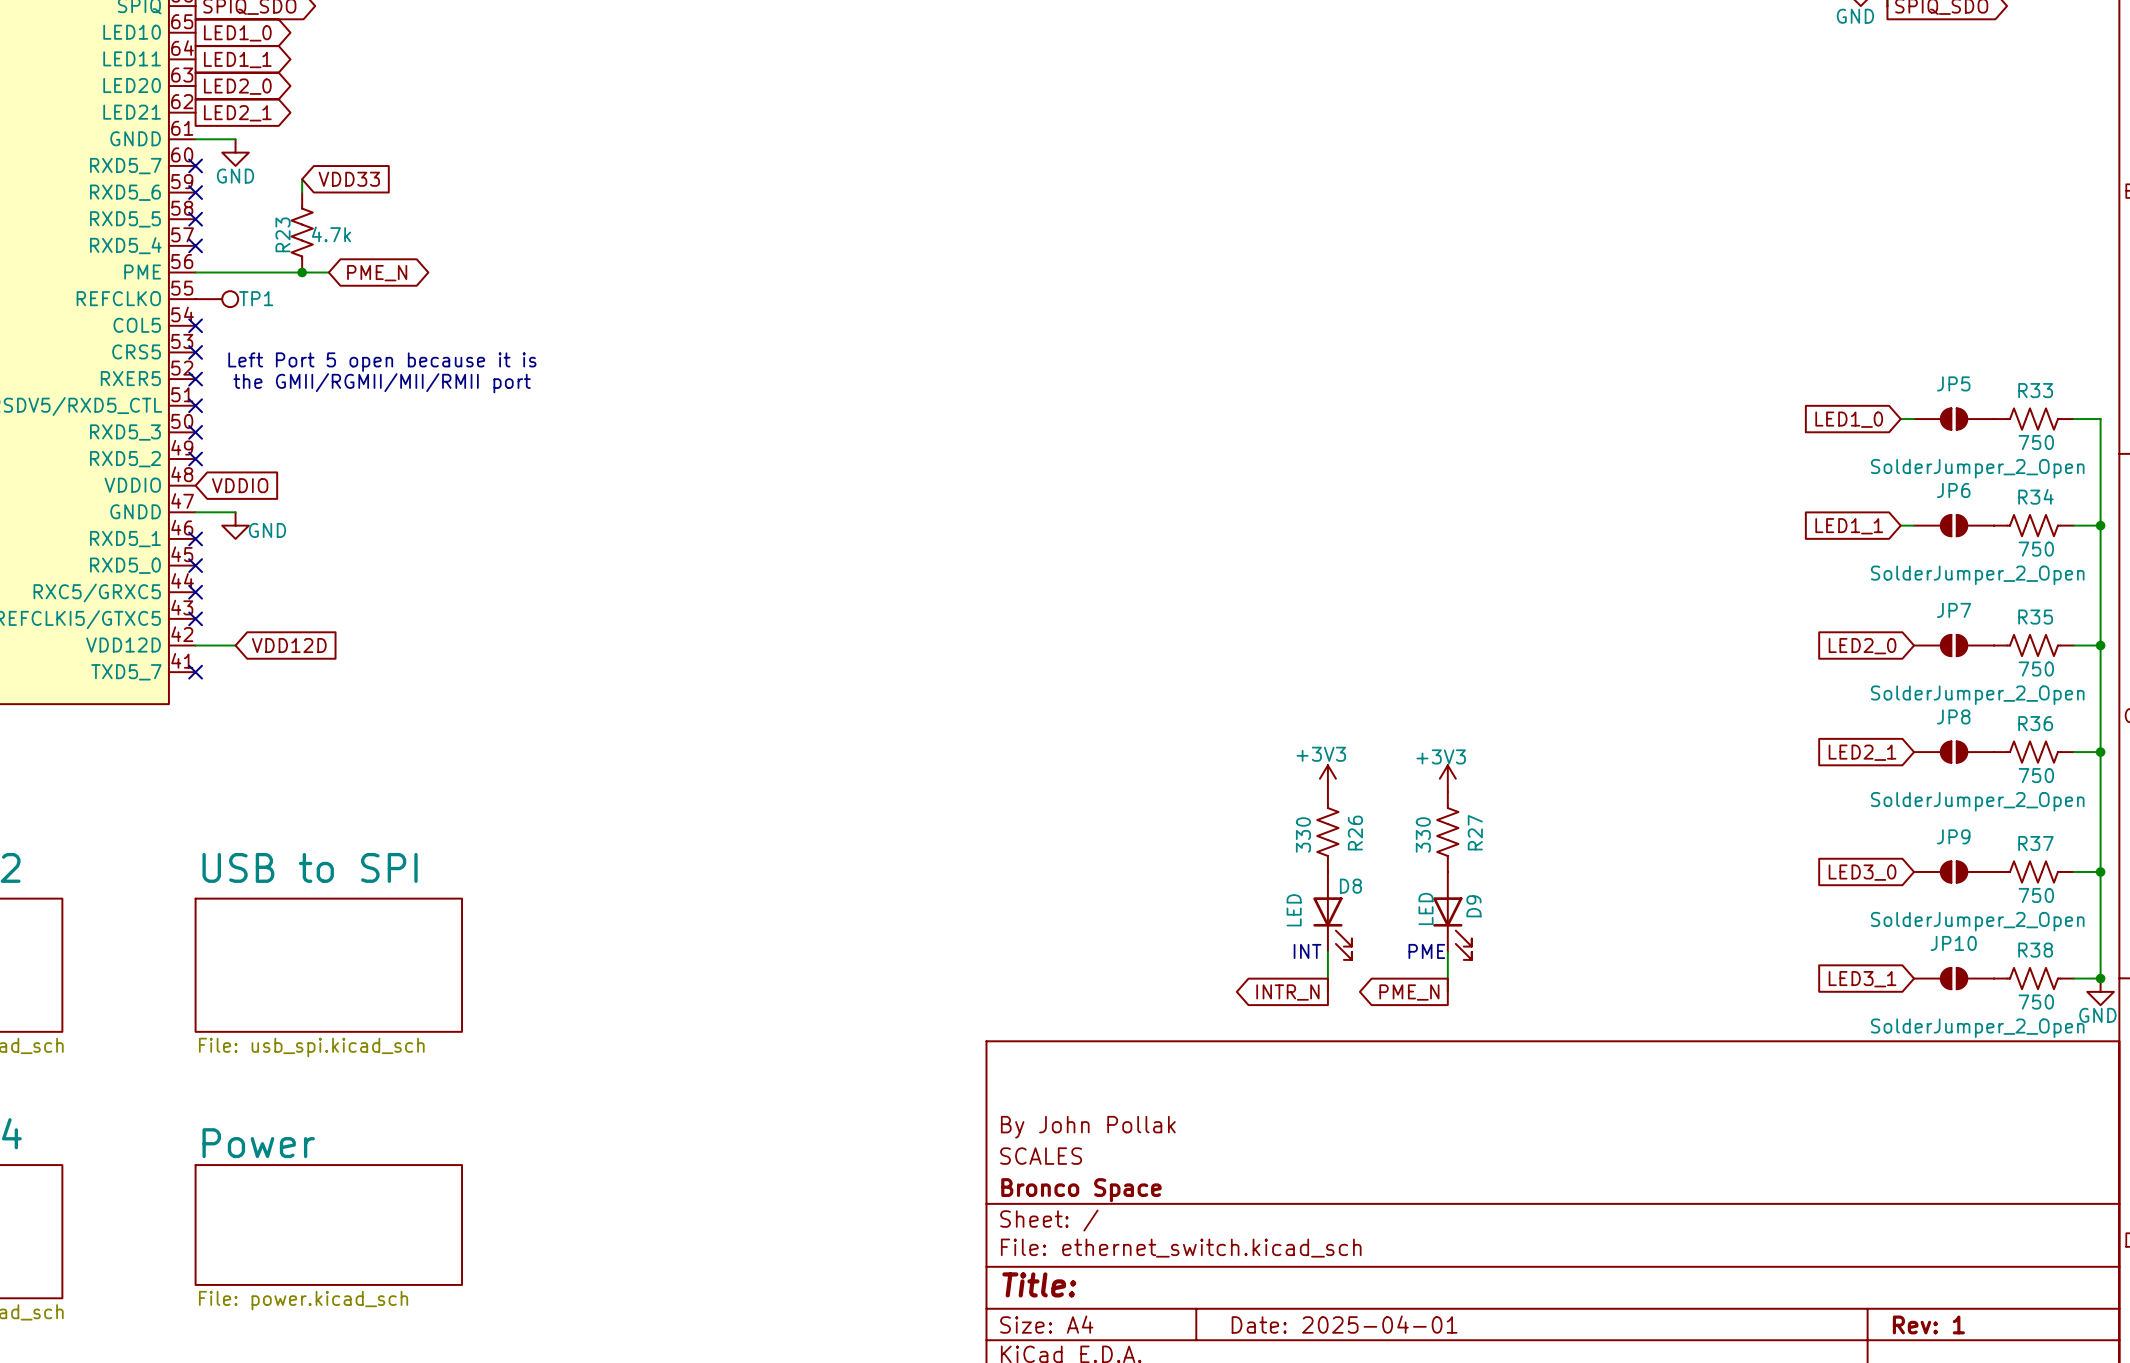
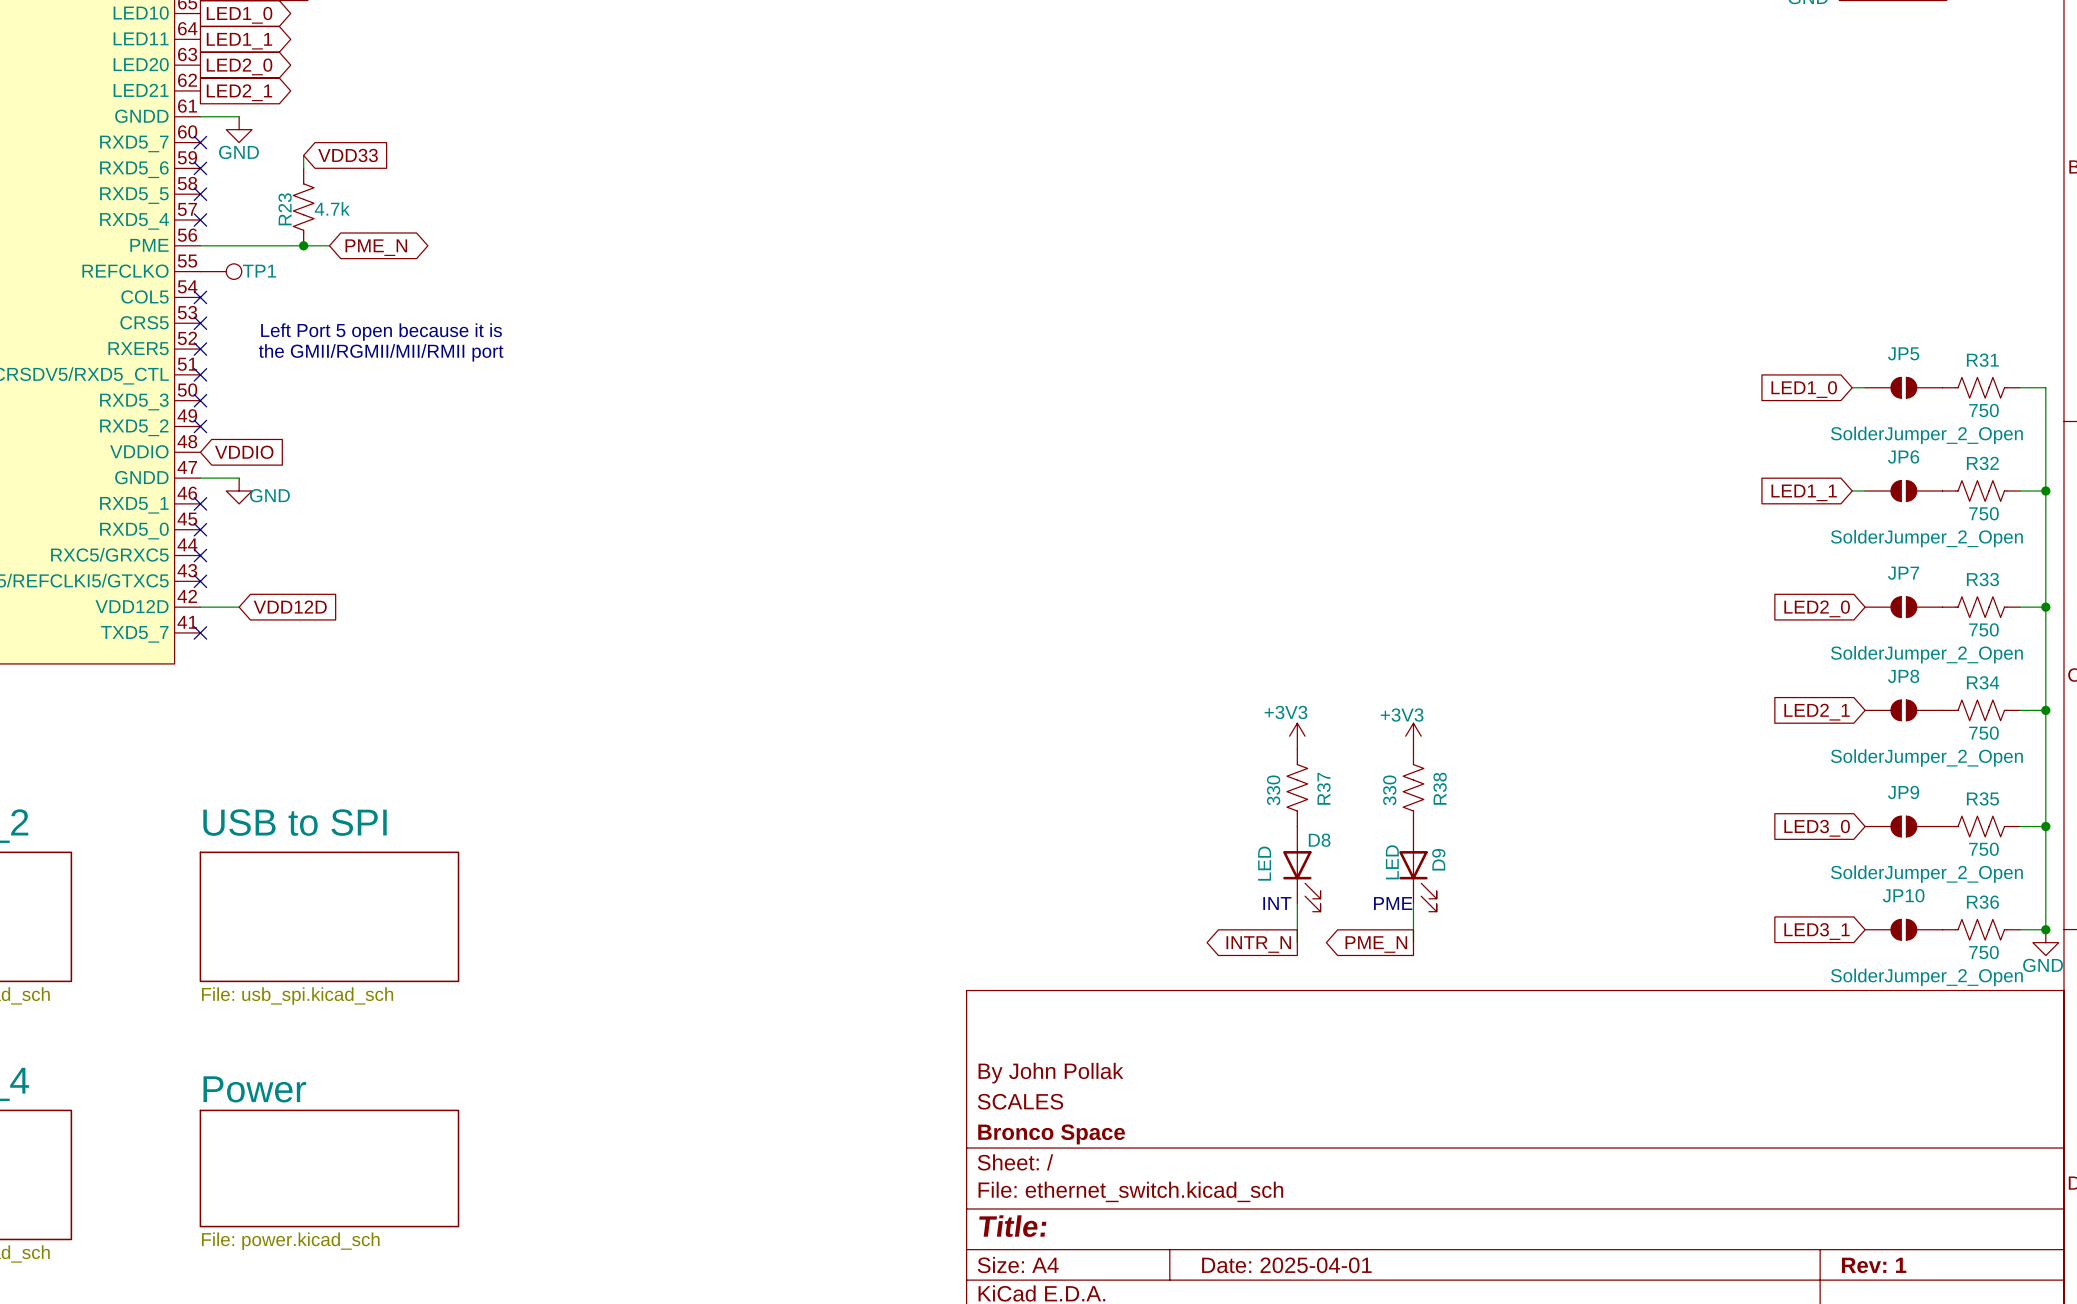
R33 name: R33 (2035, 390) -> R31 (1982, 360)
R34 name: R34 (2035, 496) -> R32 (1982, 463)
R35 name: R35 (2035, 617) -> R33 (1982, 579)
R36 name: R36 (2035, 723) -> R34 (1983, 682)
R27 name: R27 (1475, 832) -> R38 (1440, 788)
R26 name: R26 (1355, 833) -> R37 (1323, 788)
R37 name: R37 (2035, 843) -> R35 (1982, 798)
R38 name: R38 (2035, 950) -> R36 (1982, 902)

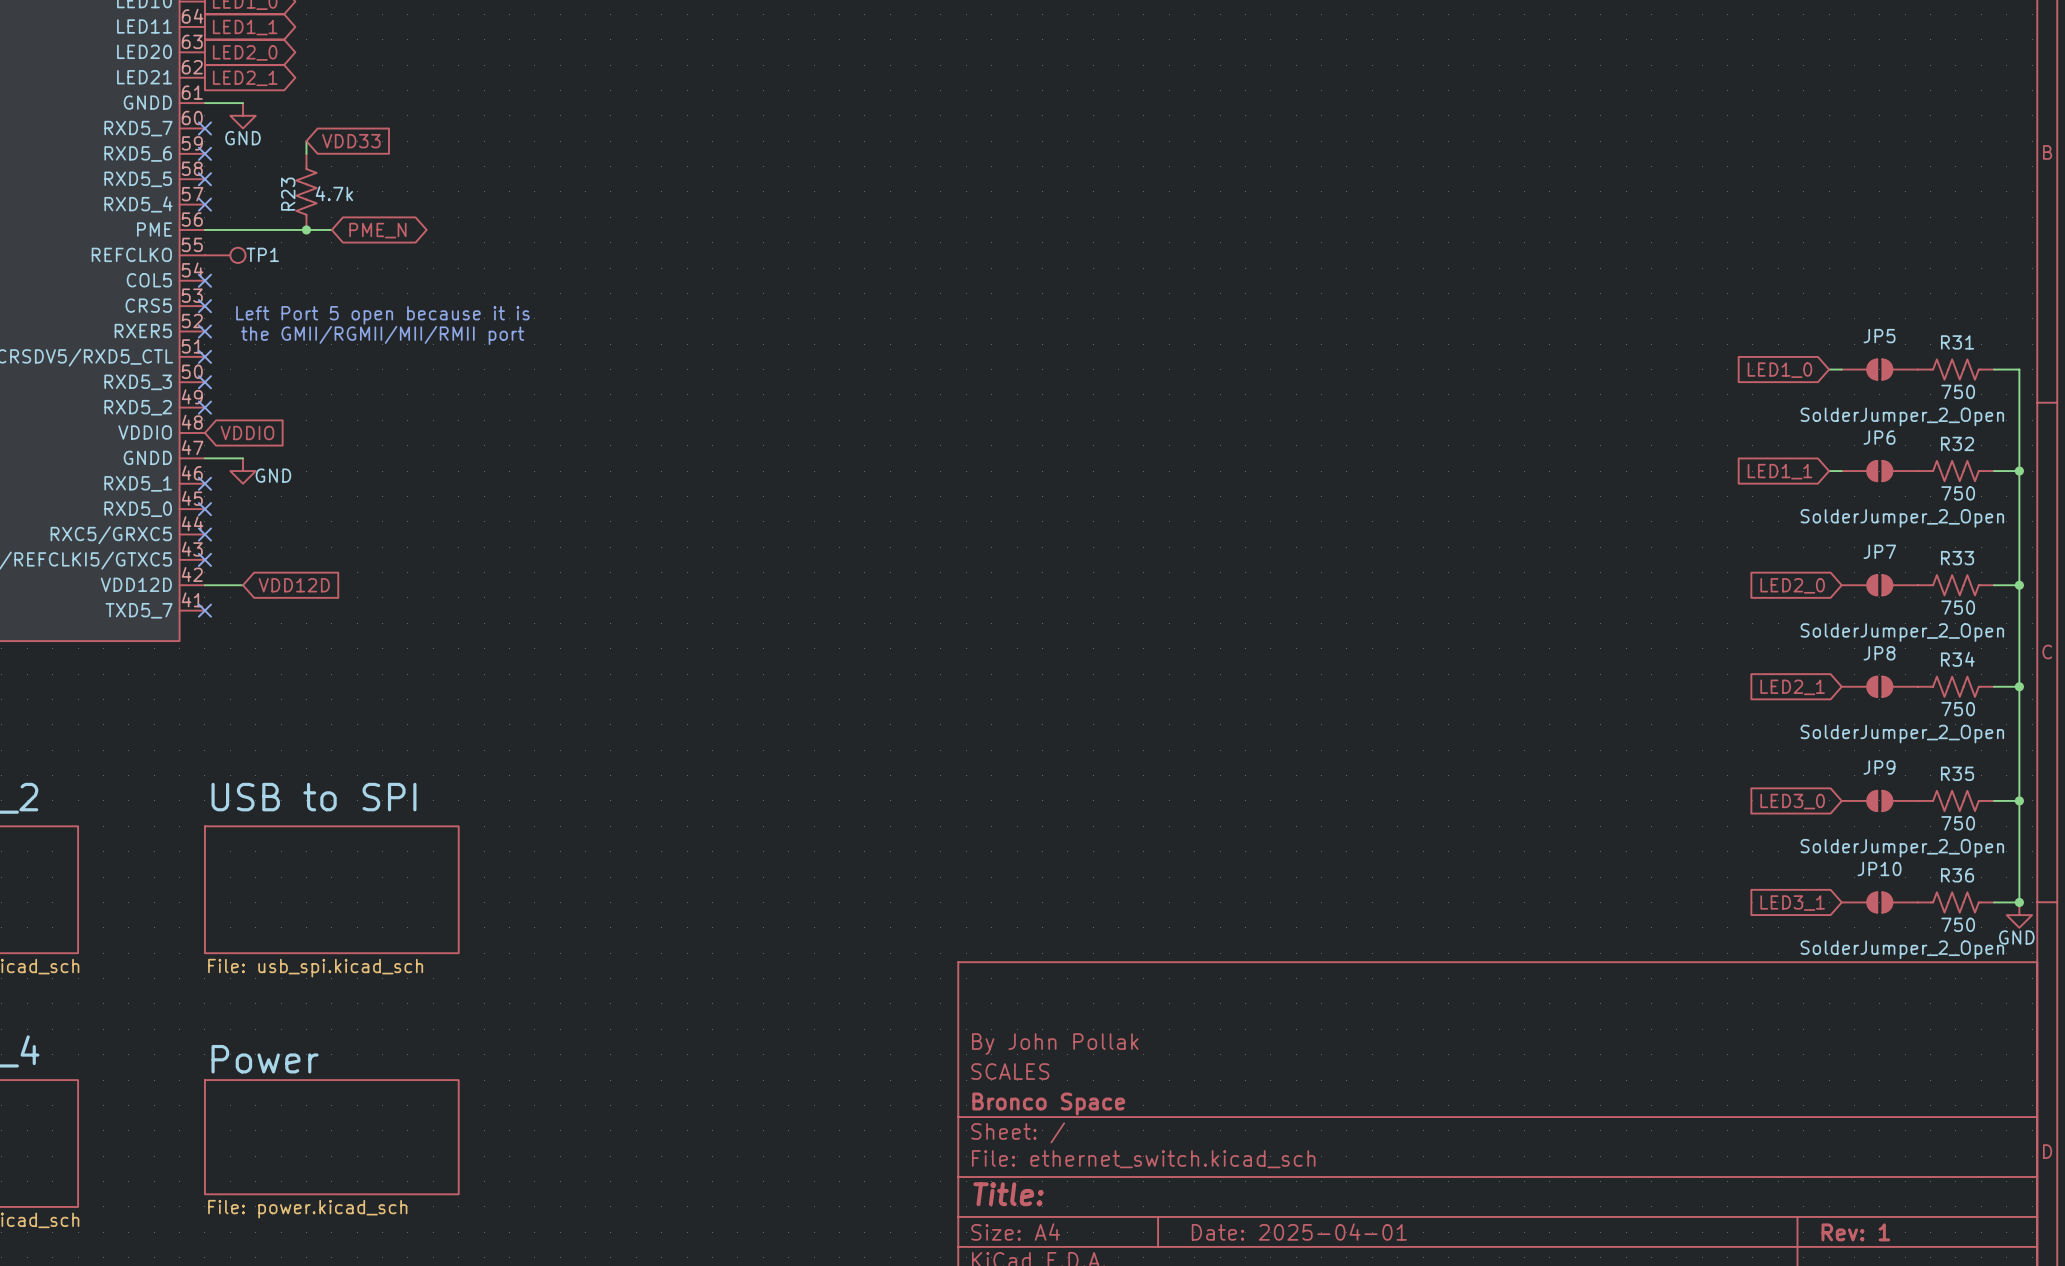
power symbol: +3V3 (1297, 736) -> none
power symbol: +3V3 (1413, 736) -> none
R37: 330 (1297, 787) -> none
R38: 330 (1413, 787) -> none
D8: LED (1301, 869) -> none
D9: LED (1417, 869) -> none
text: INT (1277, 903) -> none
wire: (1297, 903) (1297, 942) -> none
text: PME (1393, 903) -> none
wire: (1413, 903) (1413, 942) -> none
global label: INTR_N (1258, 944) -> none
global label: PME_N (1376, 944) -> none

